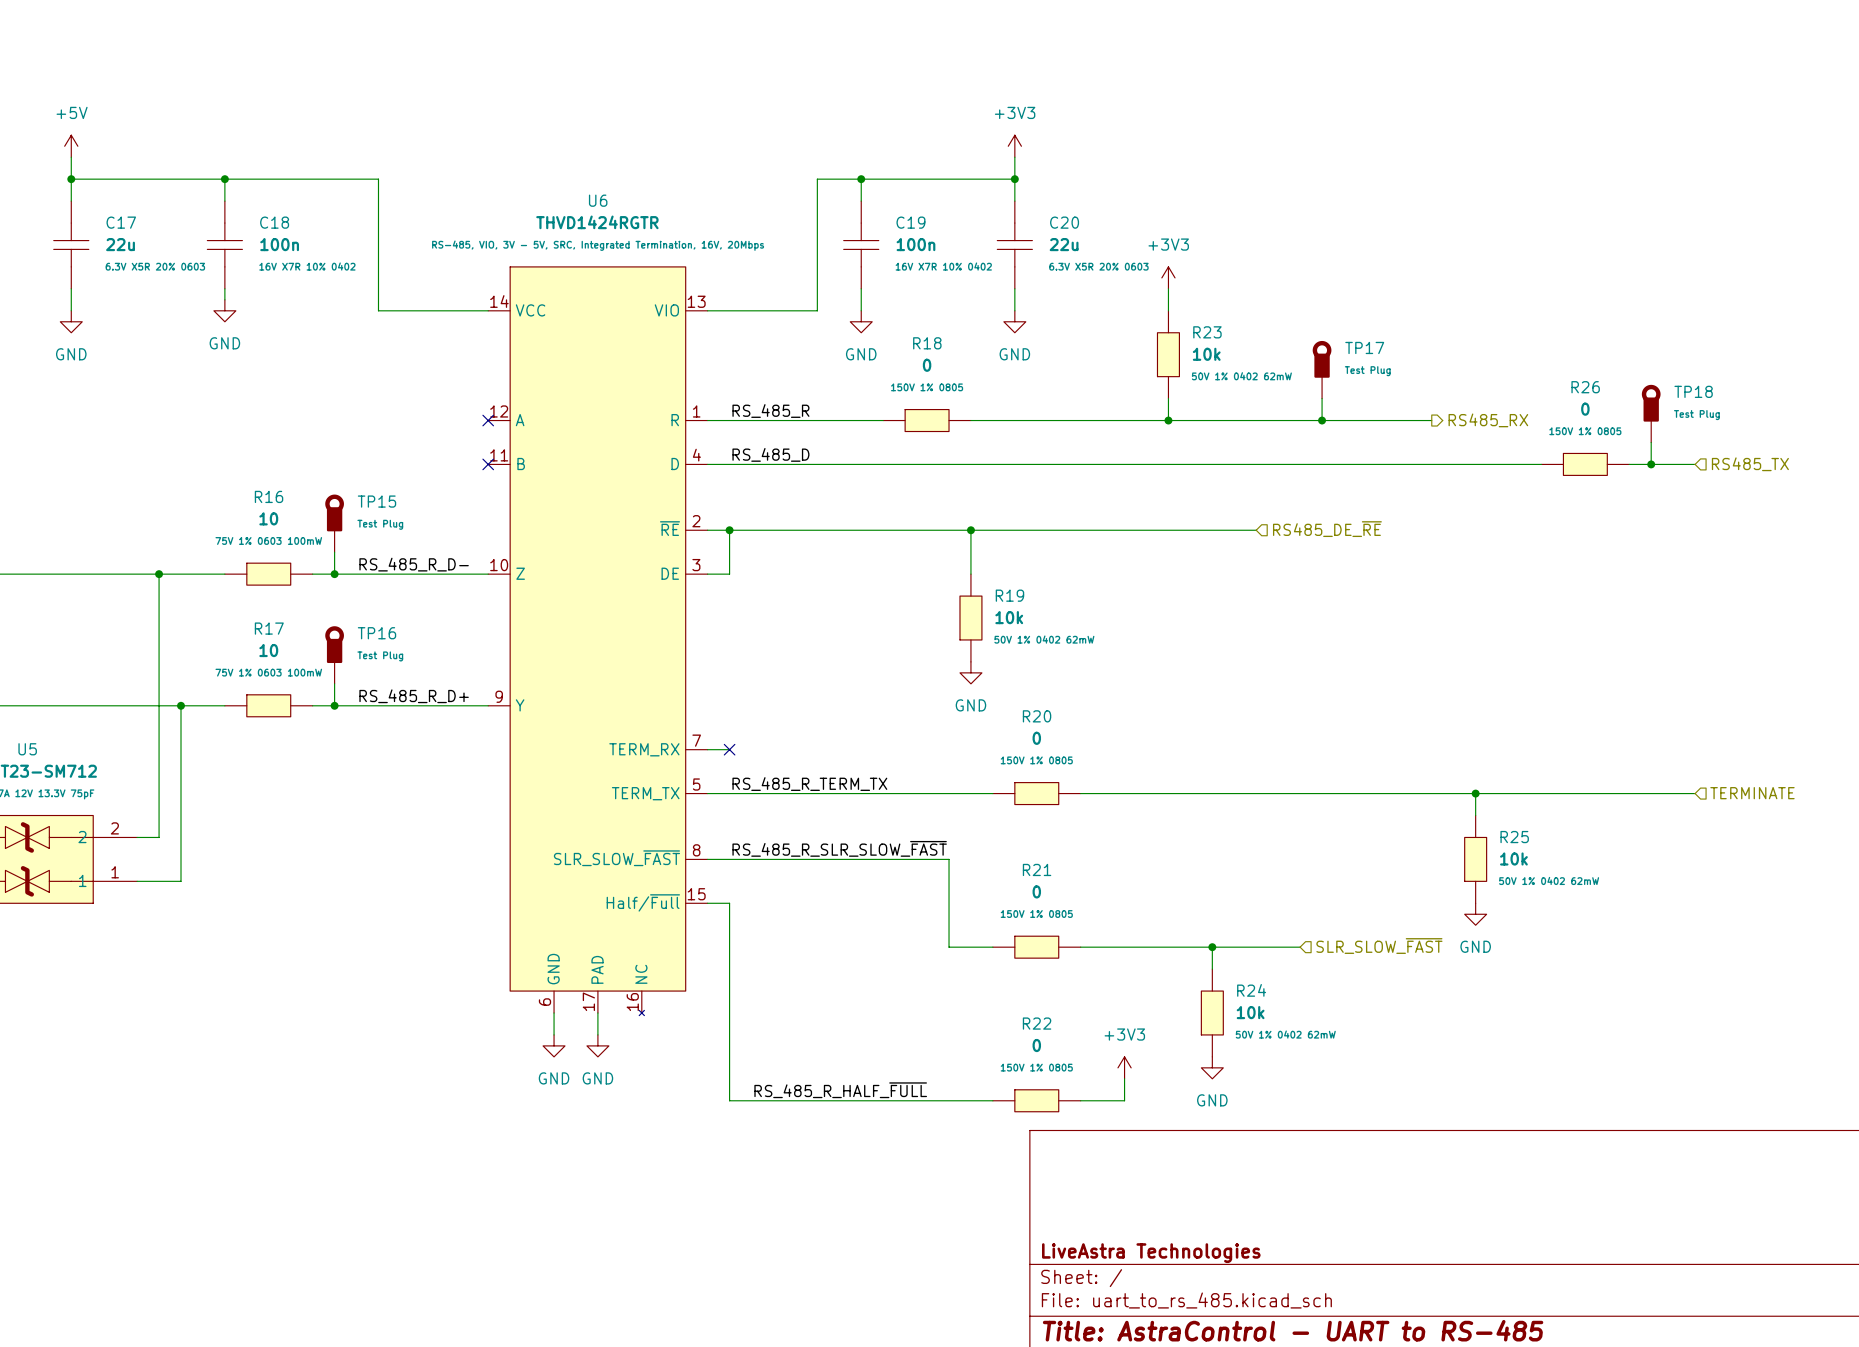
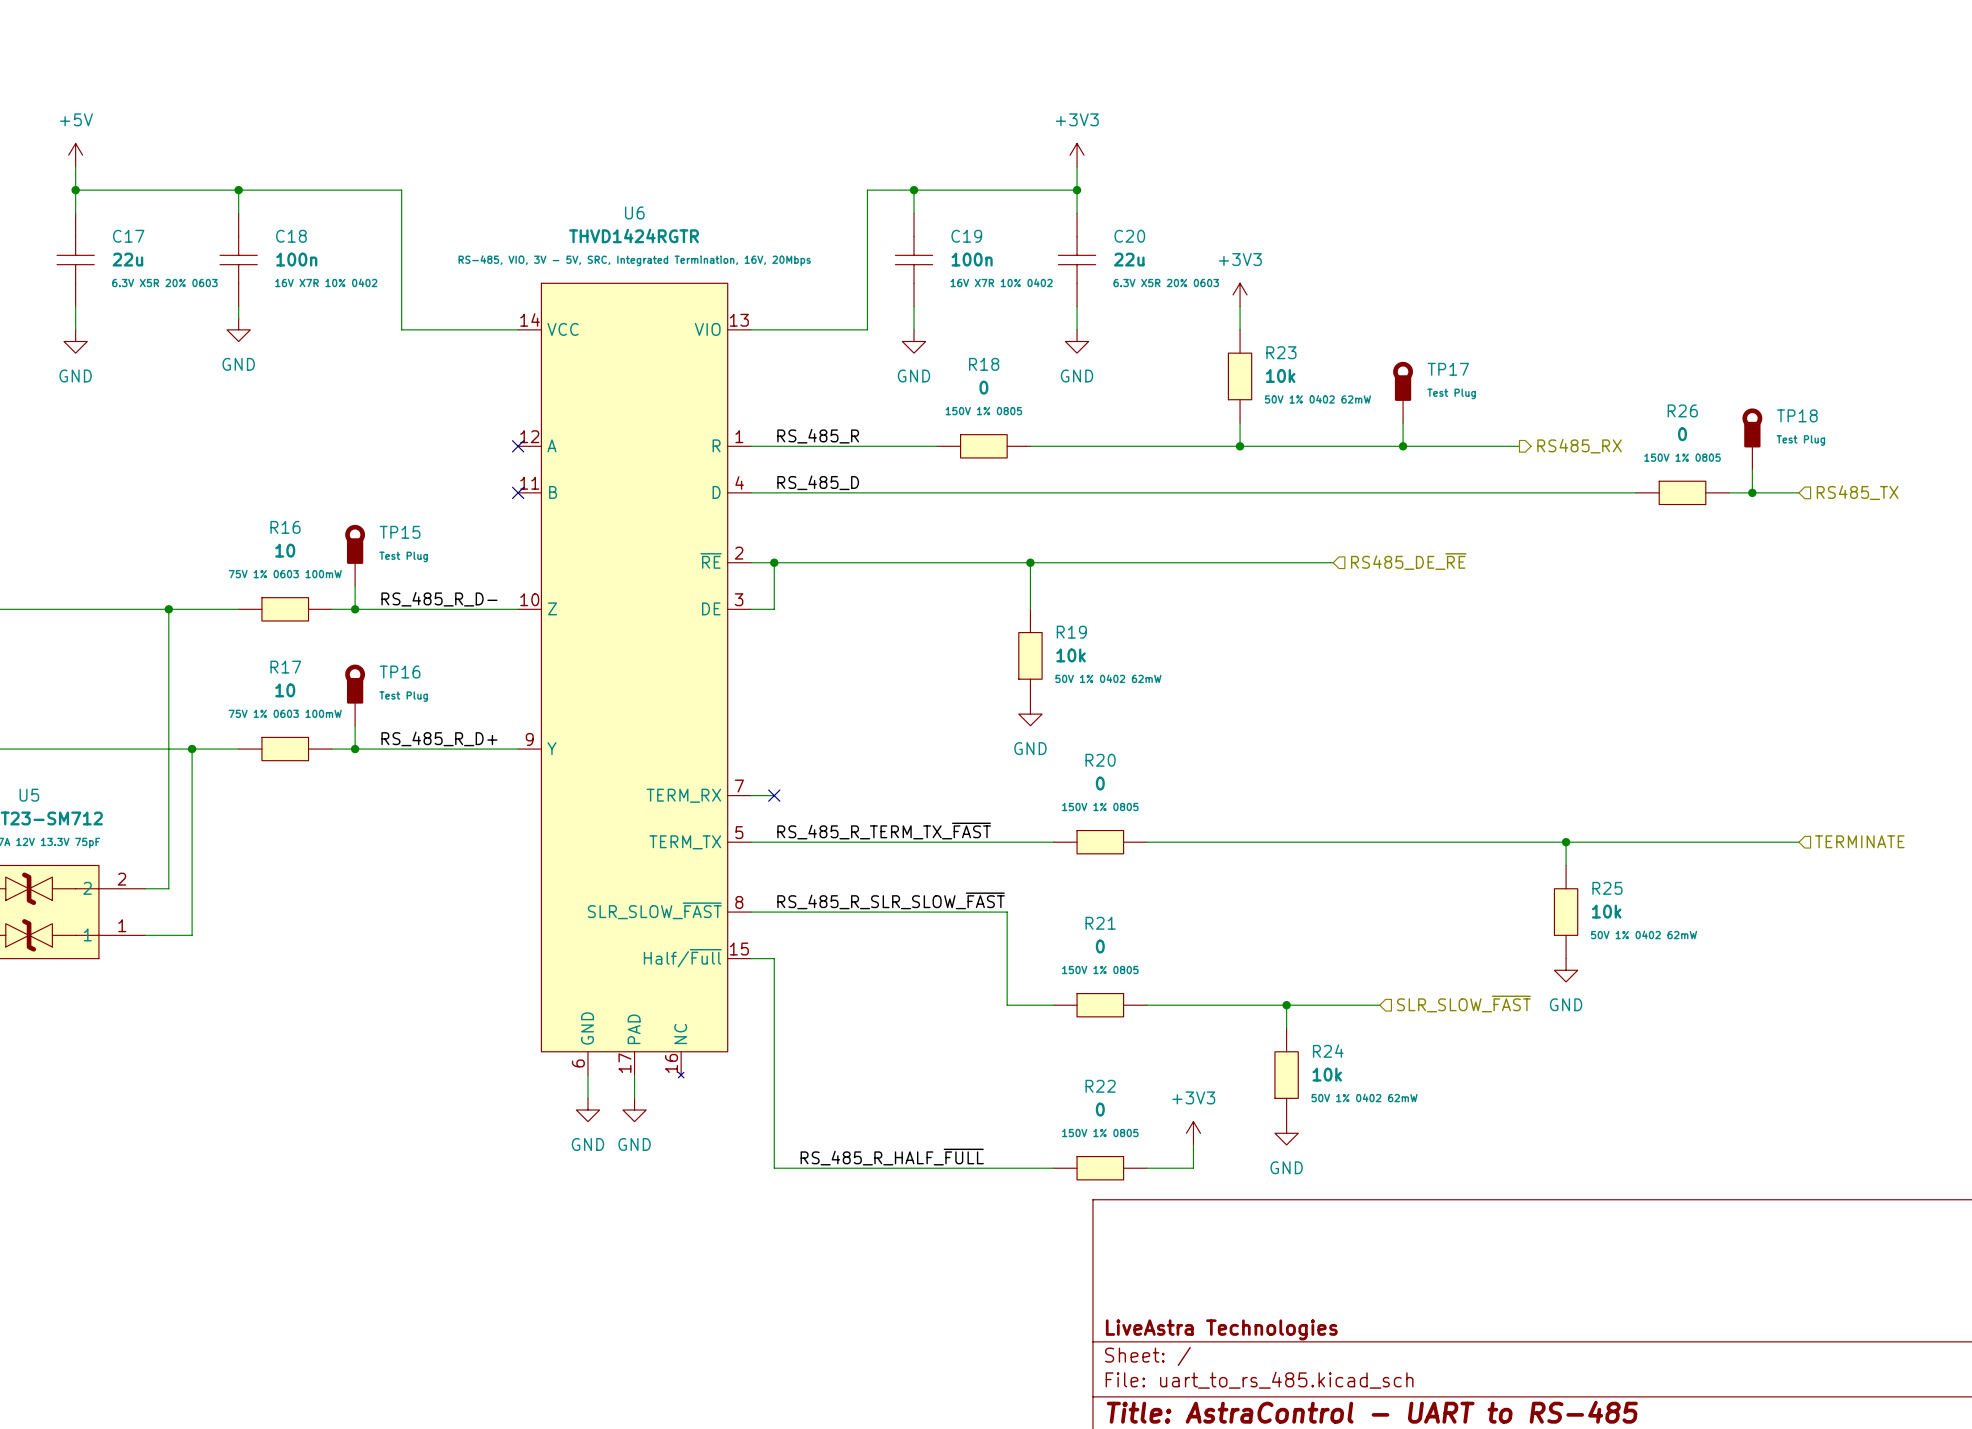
label: RS_485_R_TERM_TX (809, 784) -> RS_485_R_TERM_TX_~{FAST} (884, 831)

